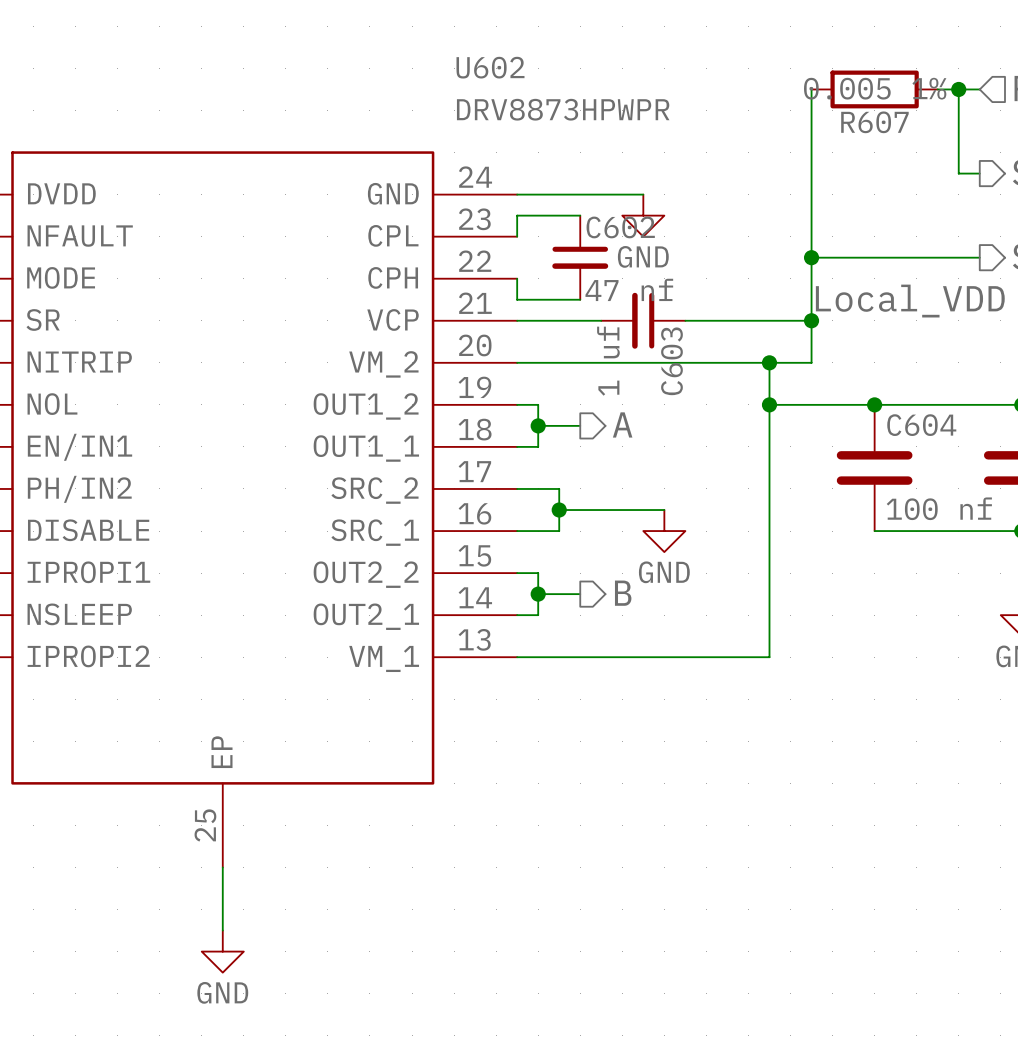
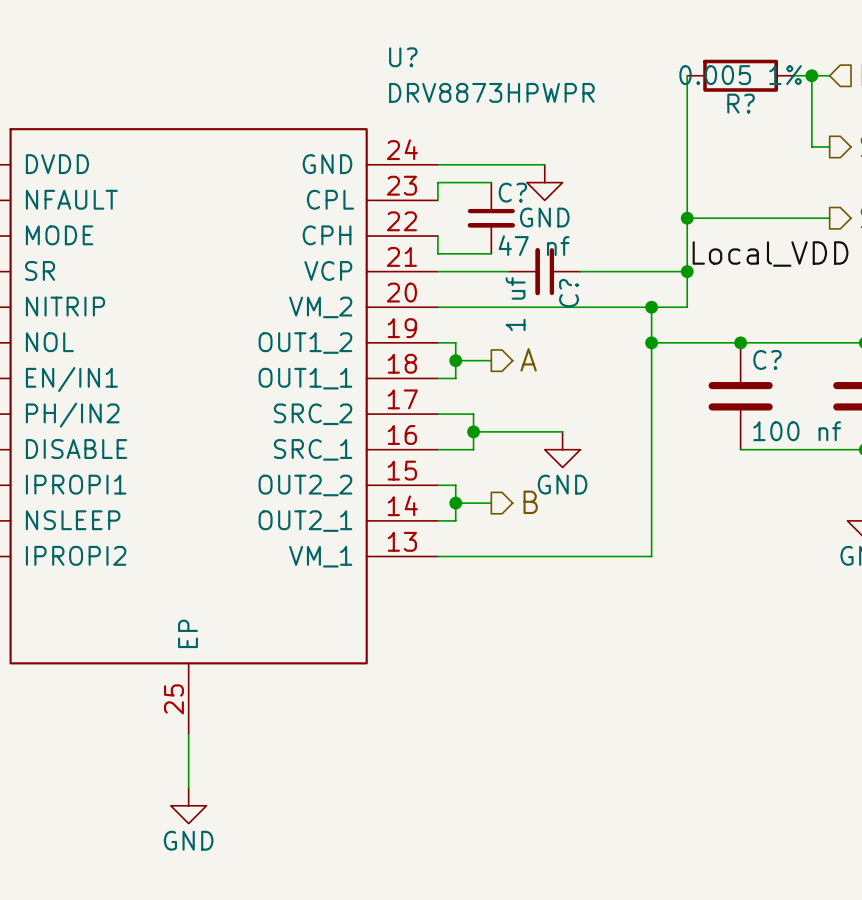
U602 name: U602 (490, 67) -> U? (403, 57)
R607 name: R607 (874, 122) -> R? (741, 103)
C602 name: C602 (620, 227) -> C? (512, 192)
C603 name: C603 (671, 361) -> C? (569, 293)
C604 name: C604 (921, 425) -> C? (767, 359)

